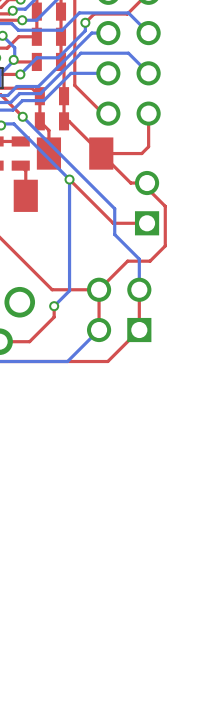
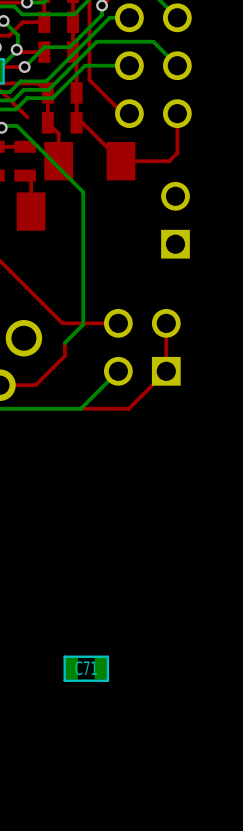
bottom track: (22, 116) (114, 208) (114, 234) (139, 259) (139, 289) -> none
via: (22, 116) -> none
top track: (101, 153) (130, 183) (147, 183) (147, 188) (165, 206) (165, 245) (150, 261) (127, 261) (99, 289) (99, 330) -> none
top track: (69, 179) (113, 223) (147, 223) -> none
via: (69, 179) -> none
via: (54, 306) -> none
C71: none -> (86, 668)

